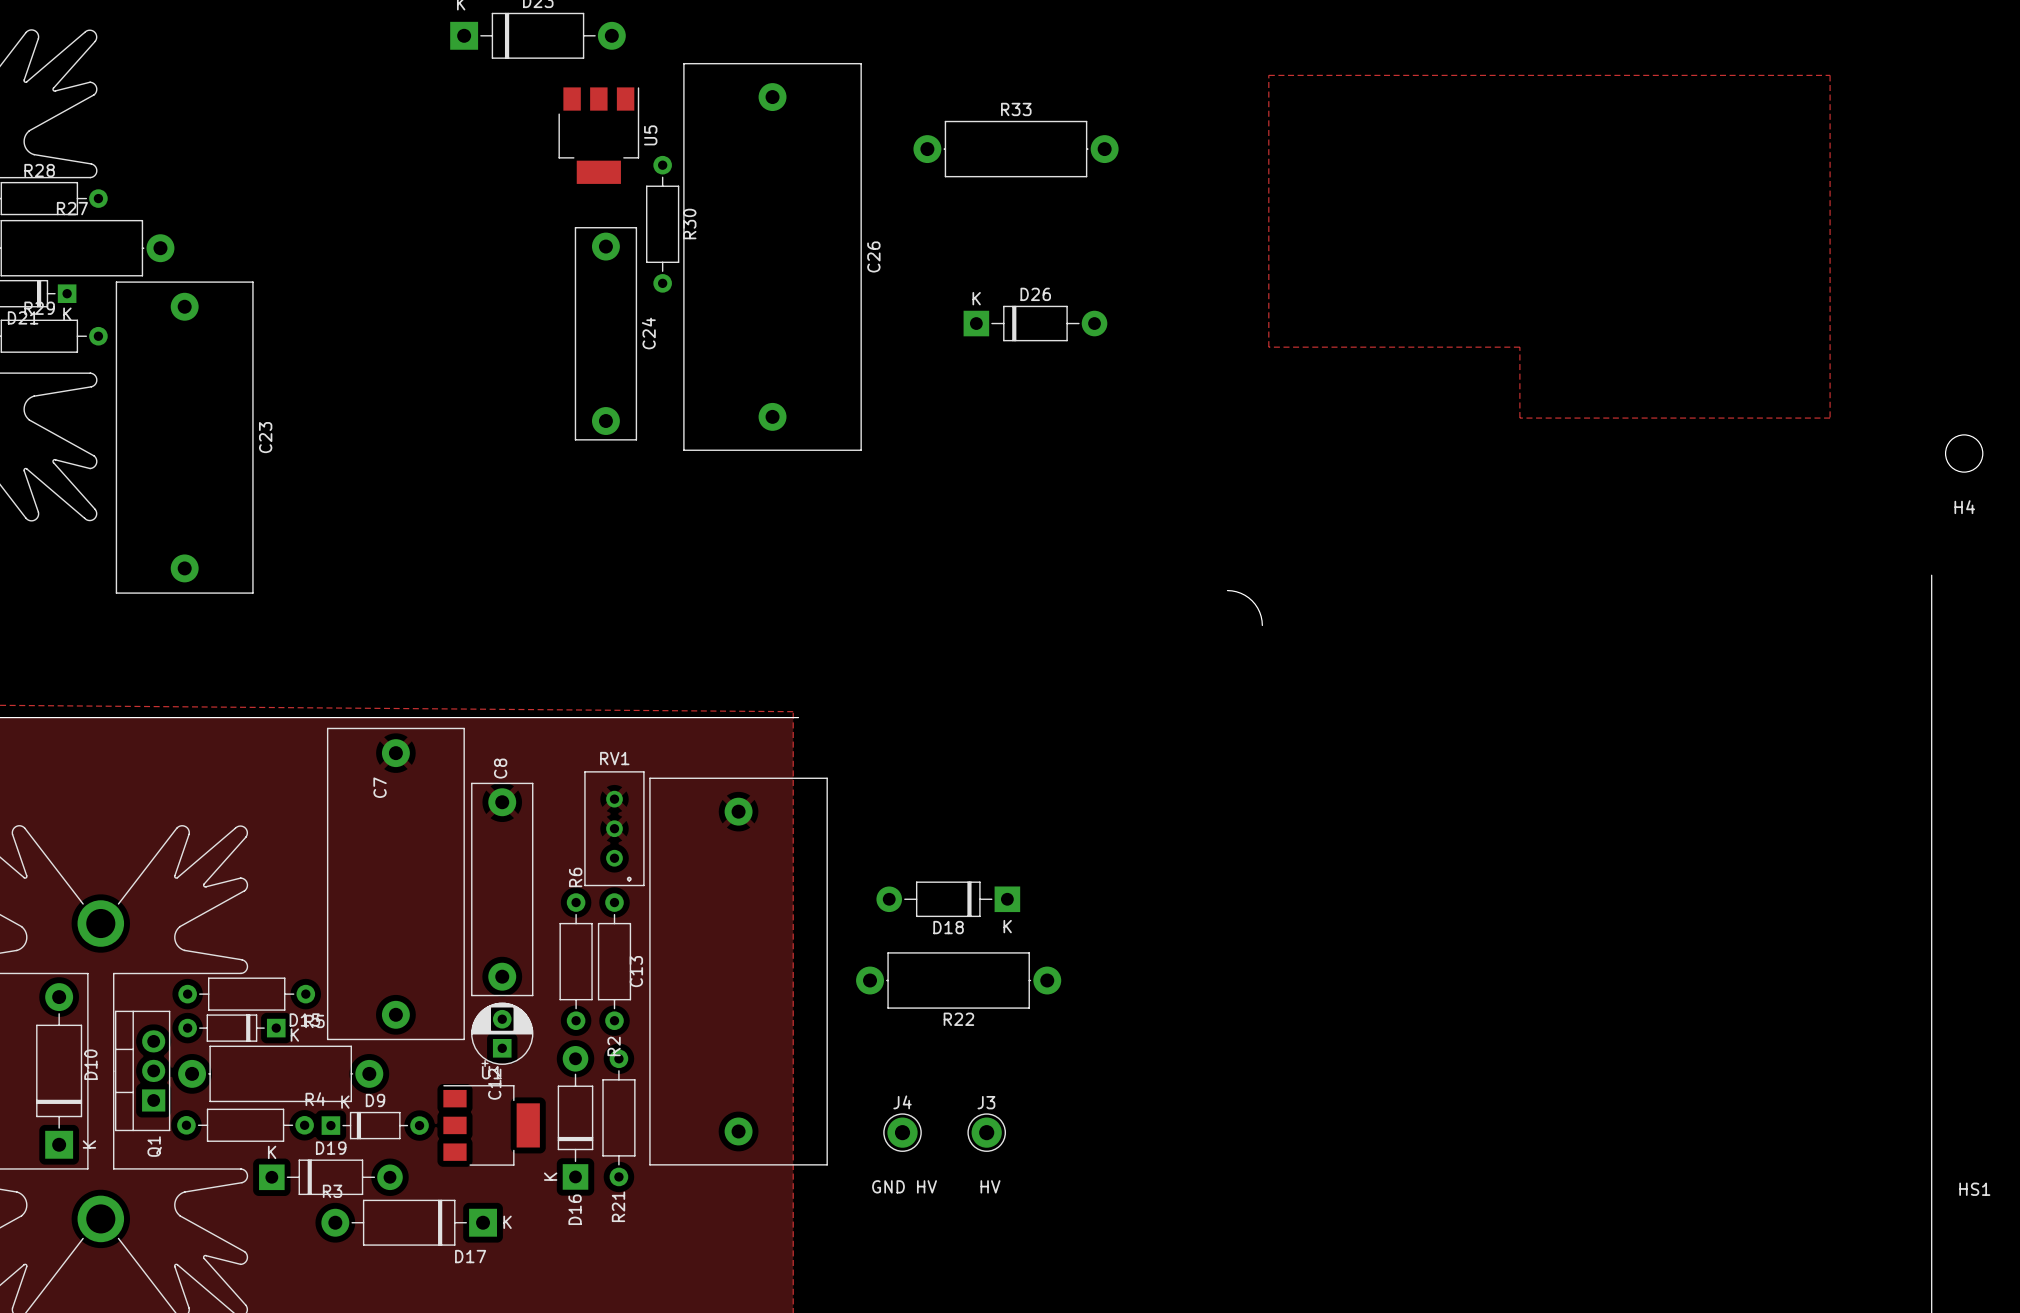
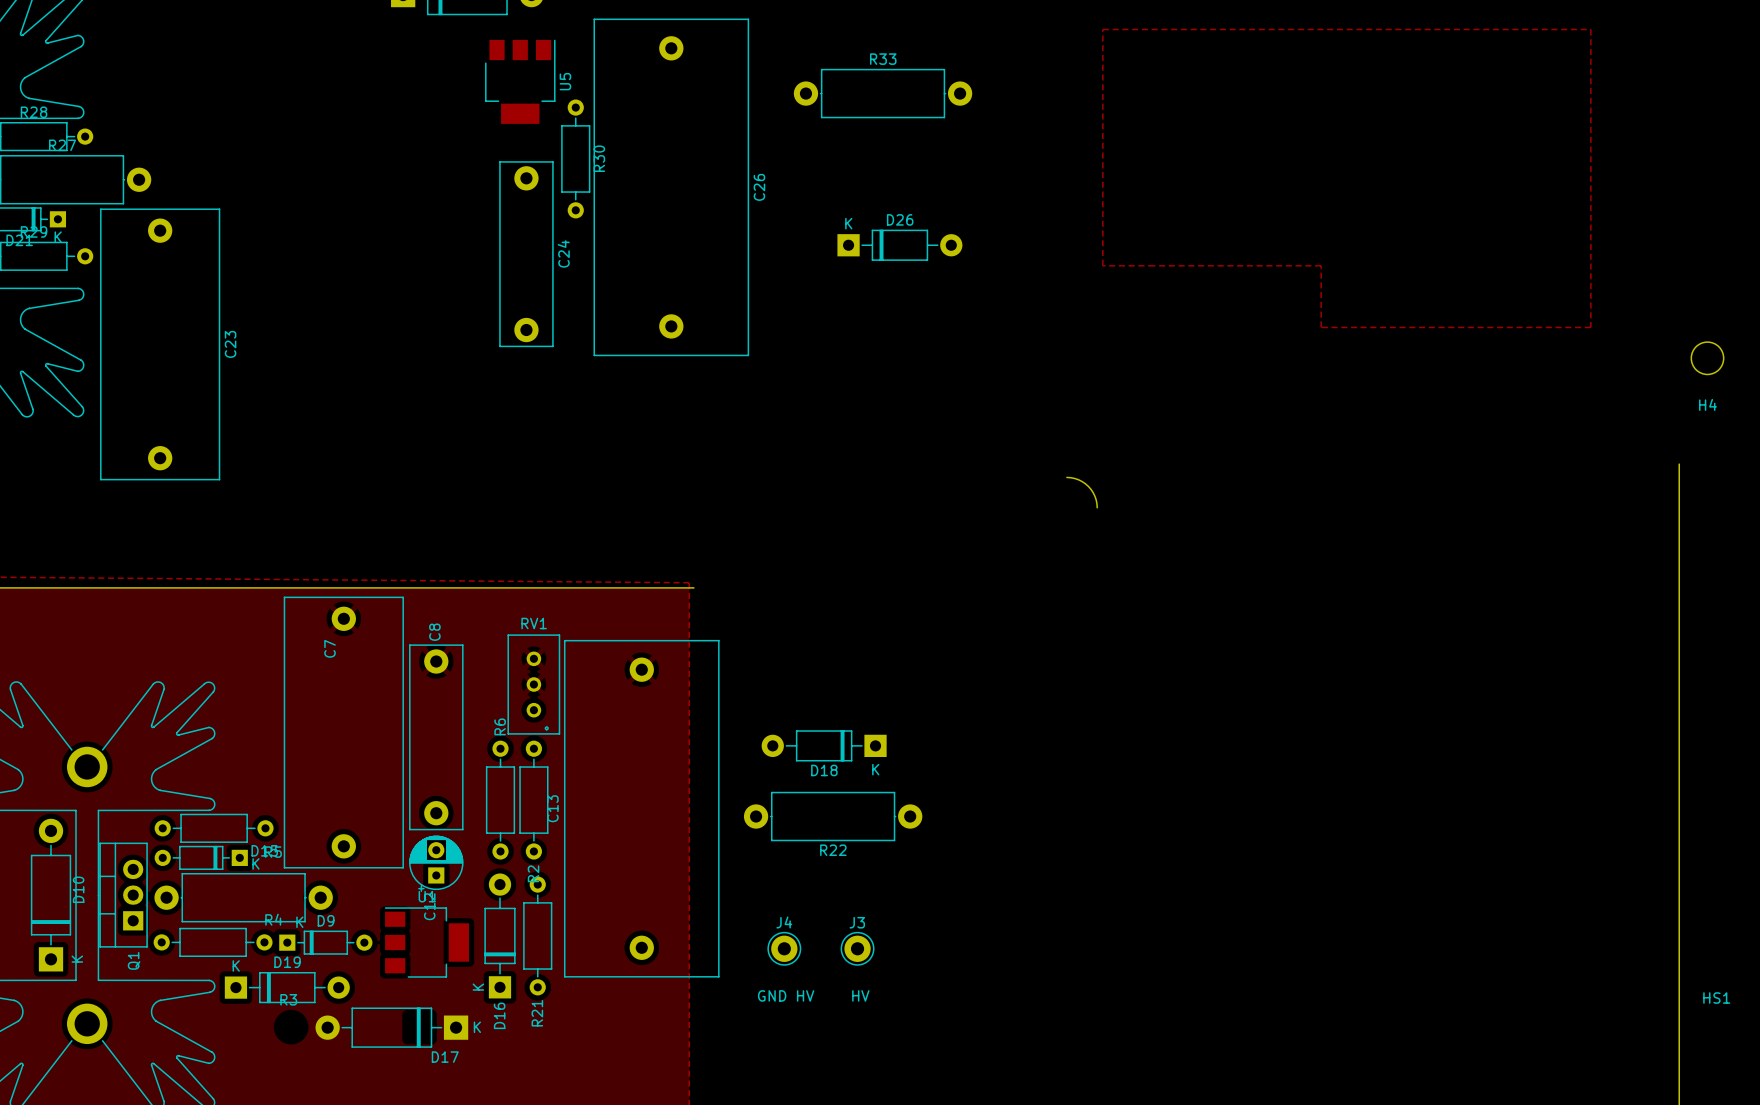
D17 position: (409, 1222) -> (391, 1027)

